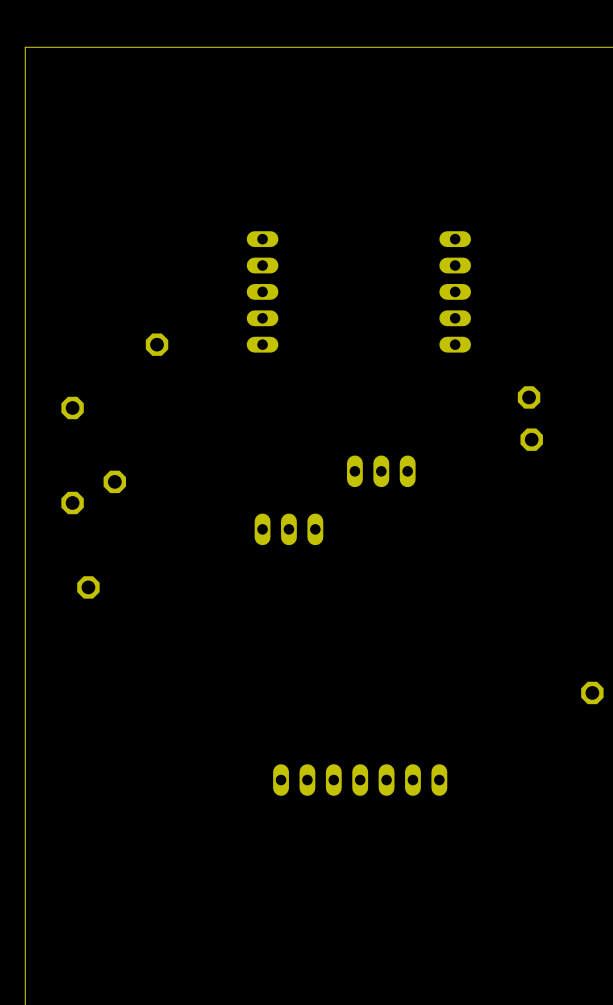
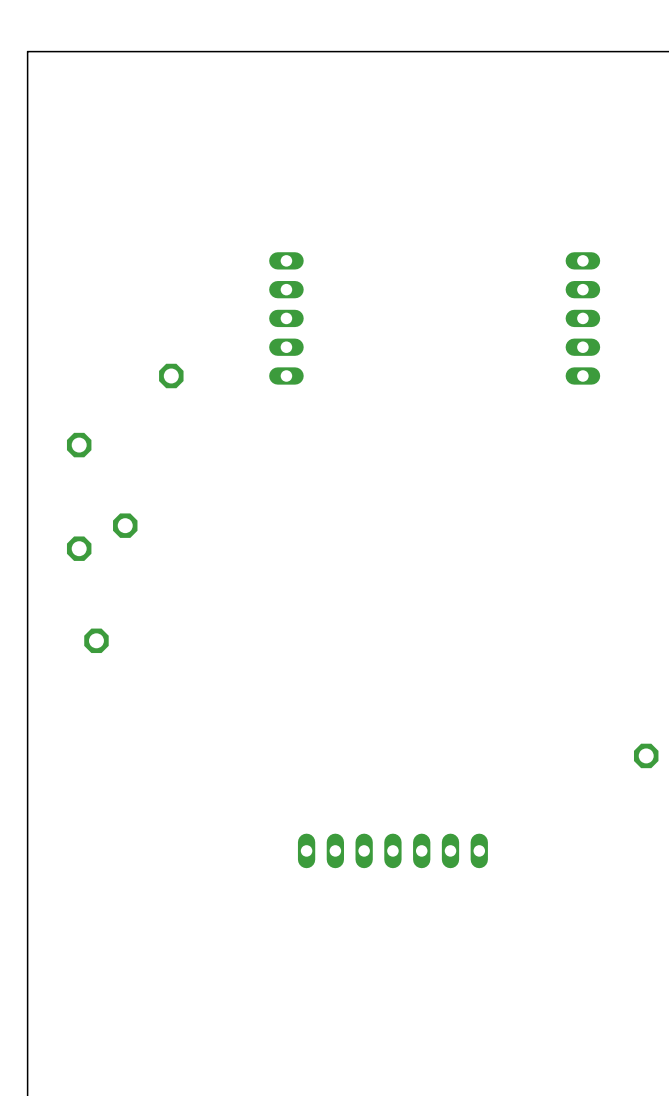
part position: (455, 291) -> (582, 318)
part: (529, 397) -> none
part: (531, 439) -> none
part: (381, 471) -> none
part: (288, 529) -> none

